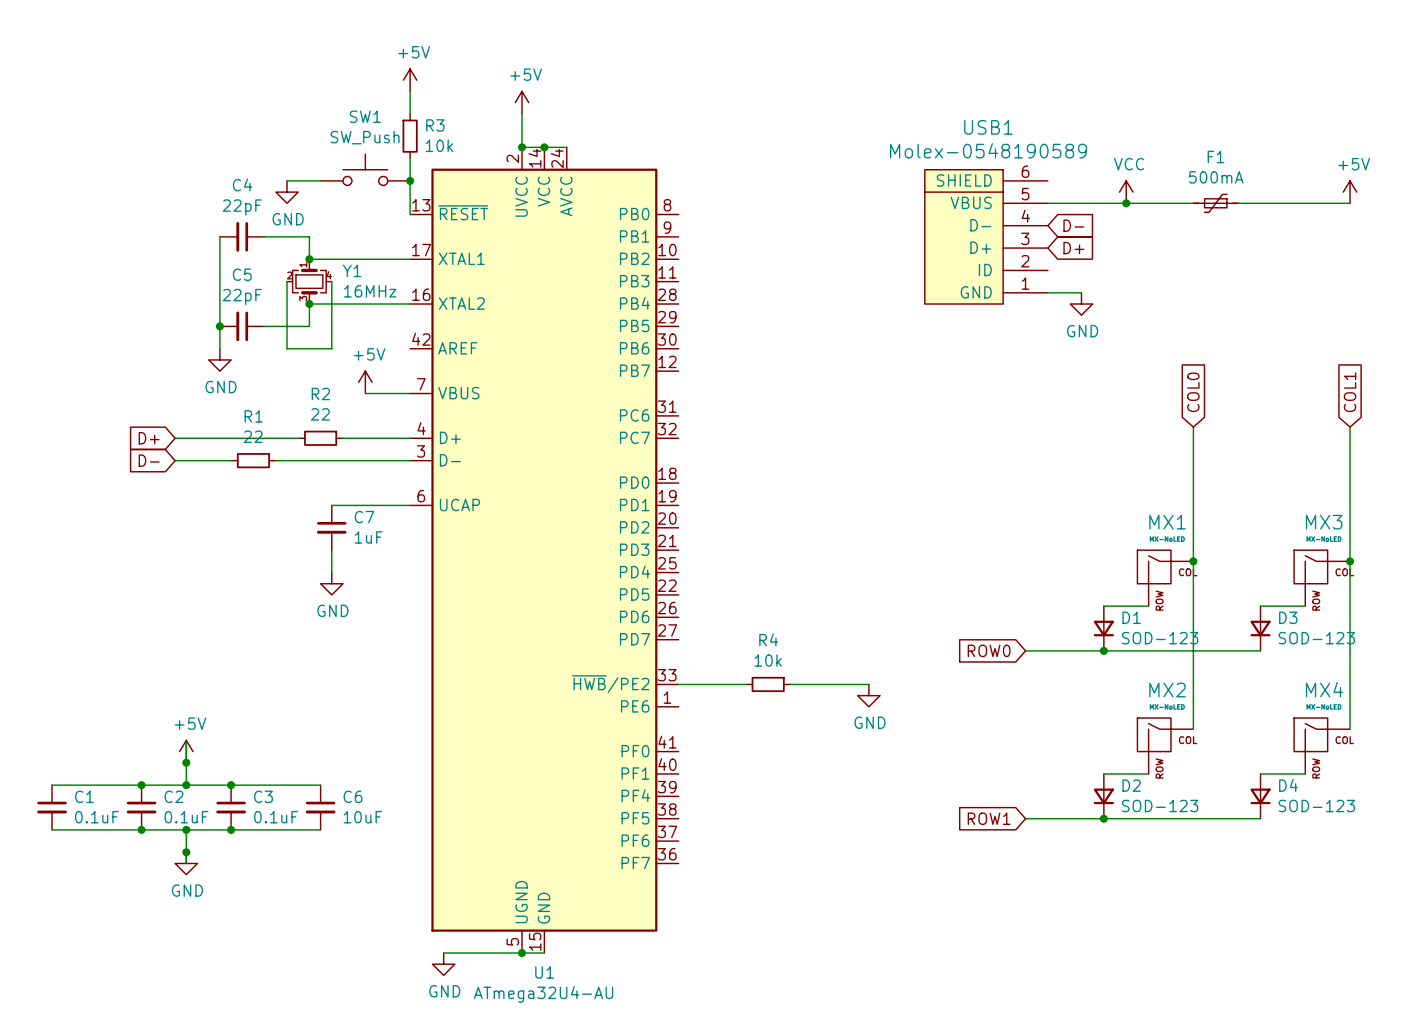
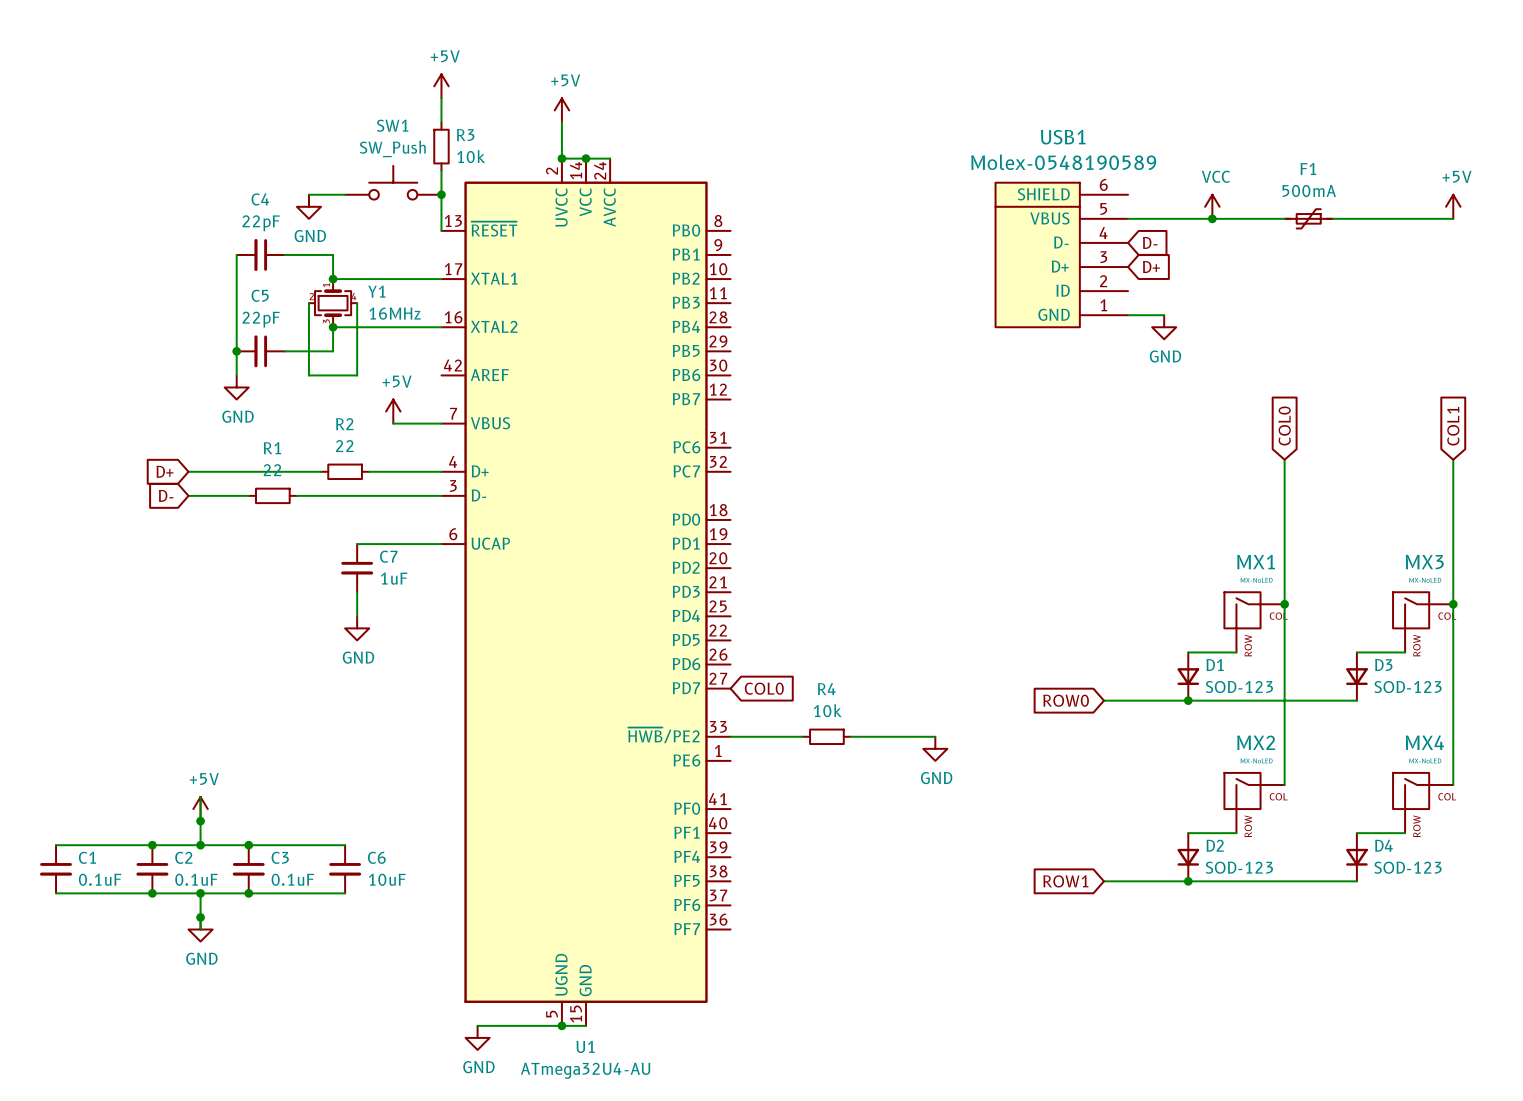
global label: none -> COL0 (764, 688)

